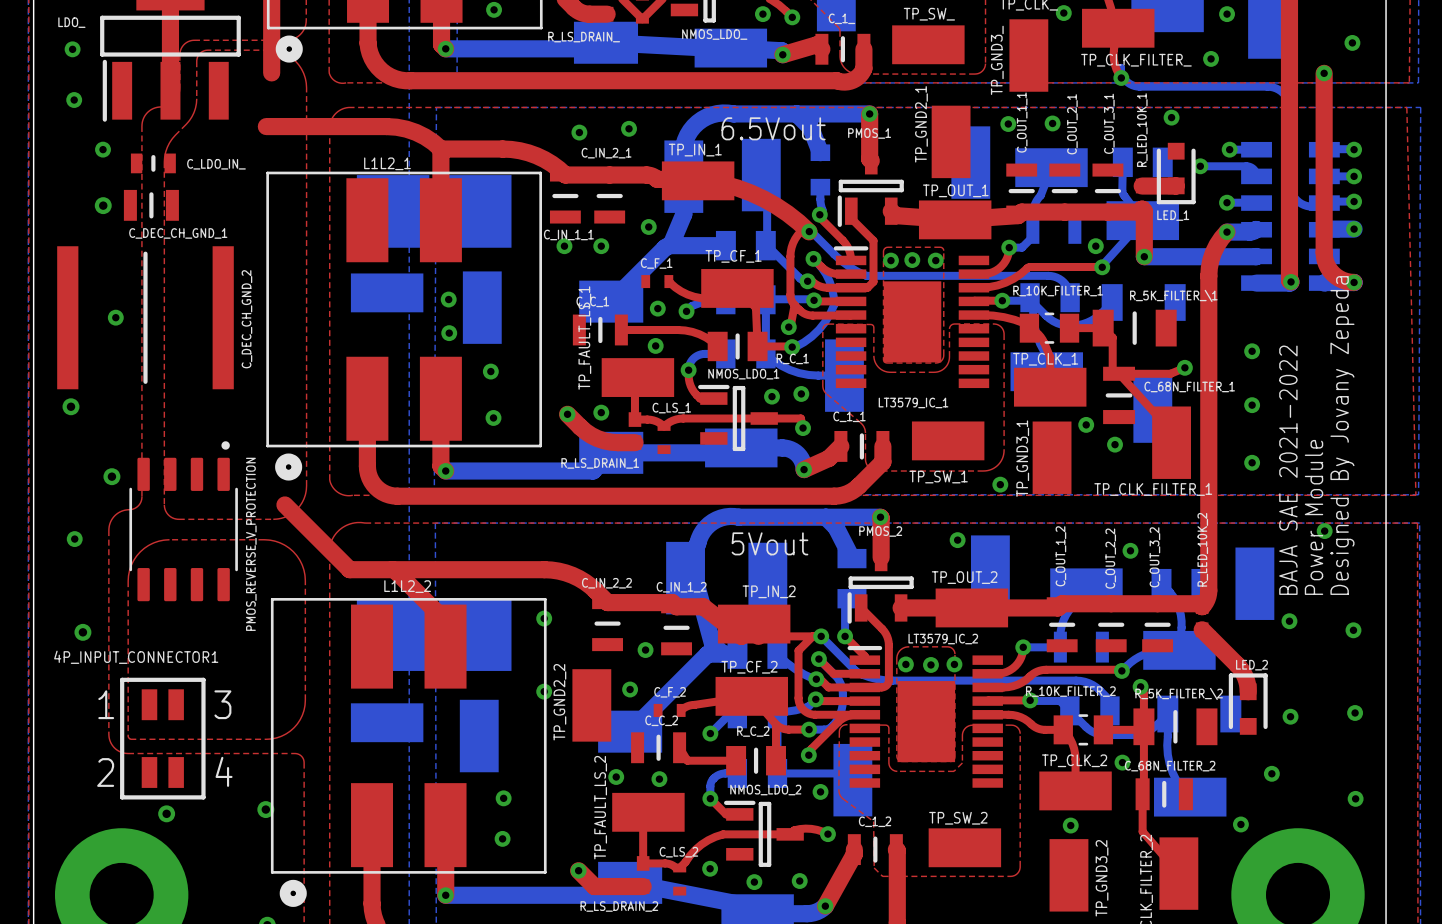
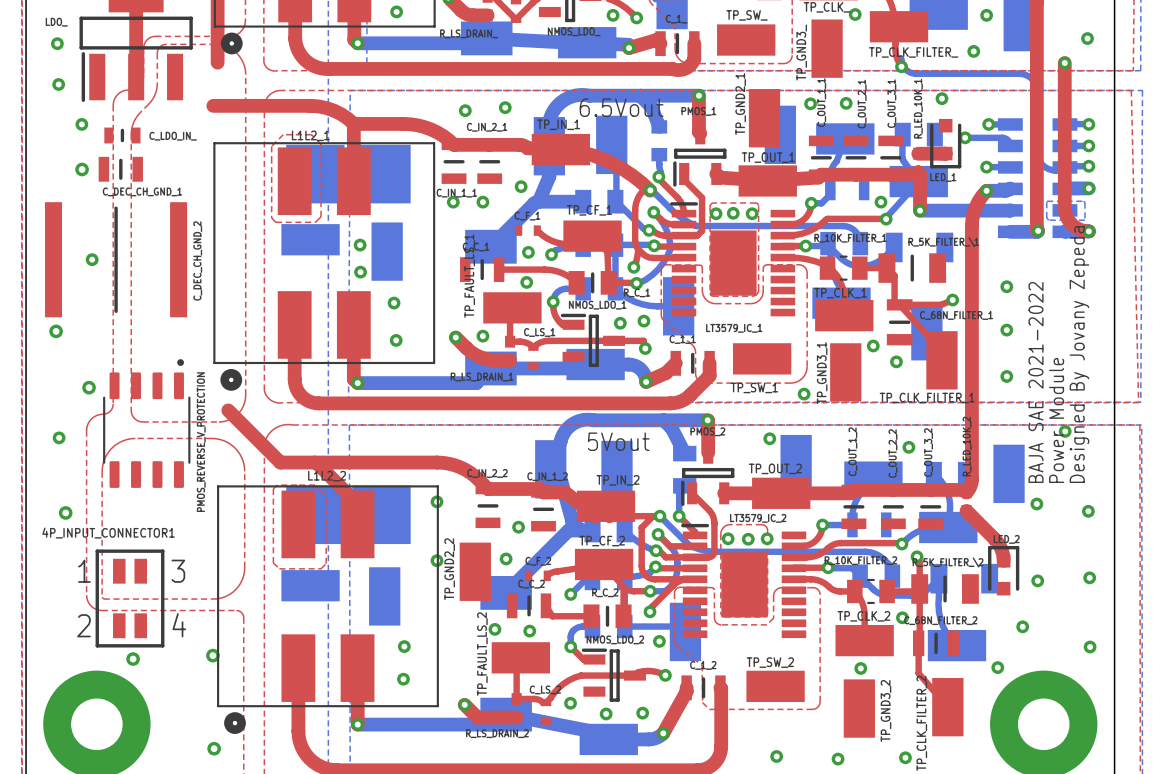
top zone outline: none -> (283, 134) (271, 146) (271, 218) (275, 222) (315, 222) (321, 216) (321, 144) (311, 134) (283, 134)
bottom zone outline: none -> (1047, 201) (1046, 218) (1048, 220) (1084, 220) (1083, 201) (1047, 201)
top zone outline: none -> (277, 485) (315, 485) (326, 496) (326, 563) (321, 568) (279, 568) (273, 562) (273, 488) (277, 485)

